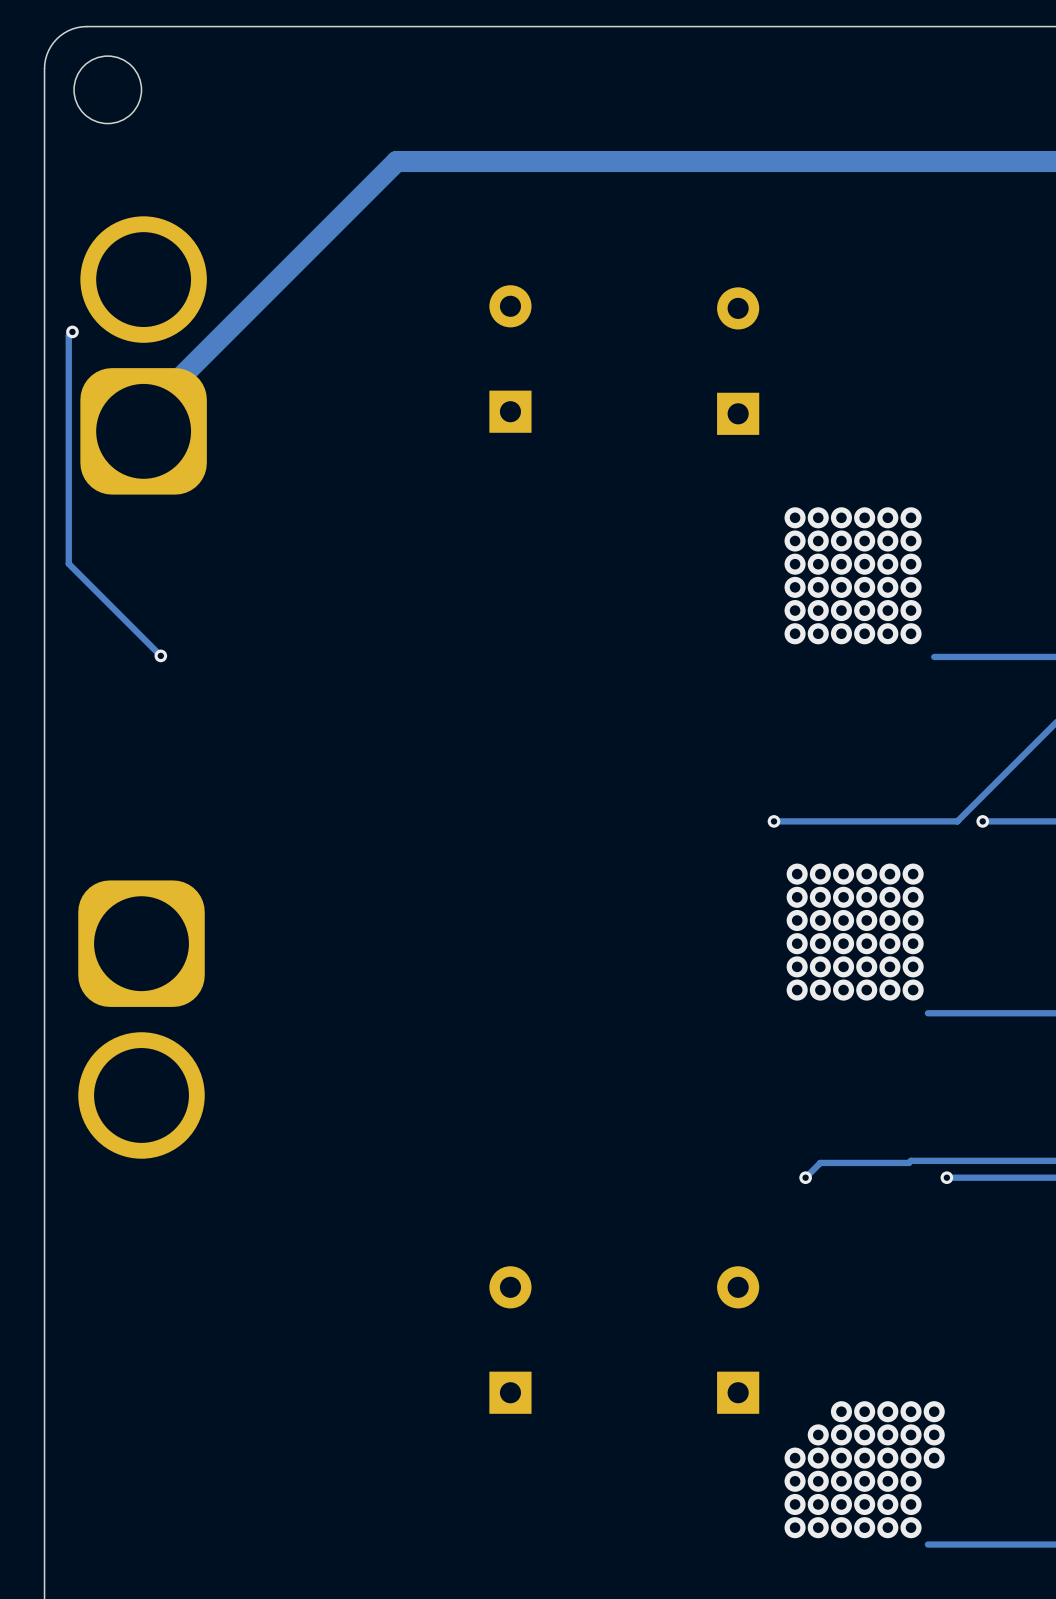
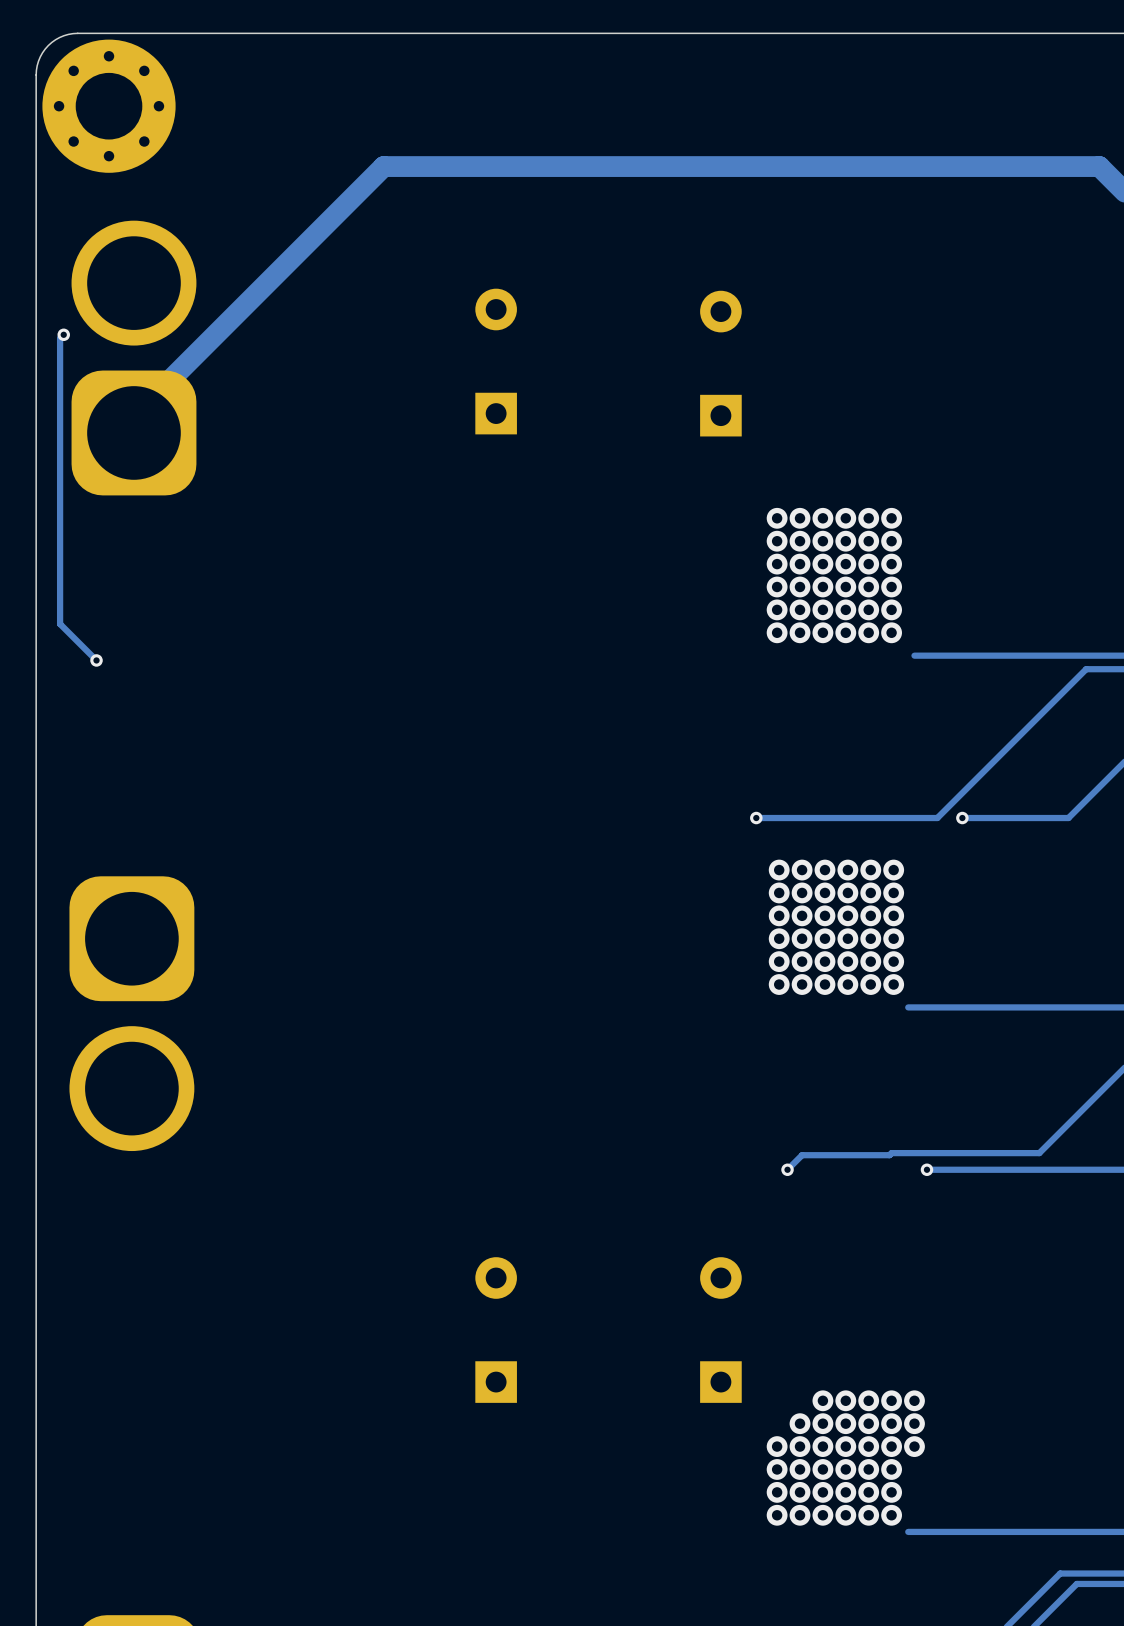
round board edge: [73, 55, 143, 125] -> none
part: none -> (109, 106)
track: (68, 563) (160, 655) -> (60, 563) (60, 624) (96, 660)
via position: (160, 655) -> (96, 660)

